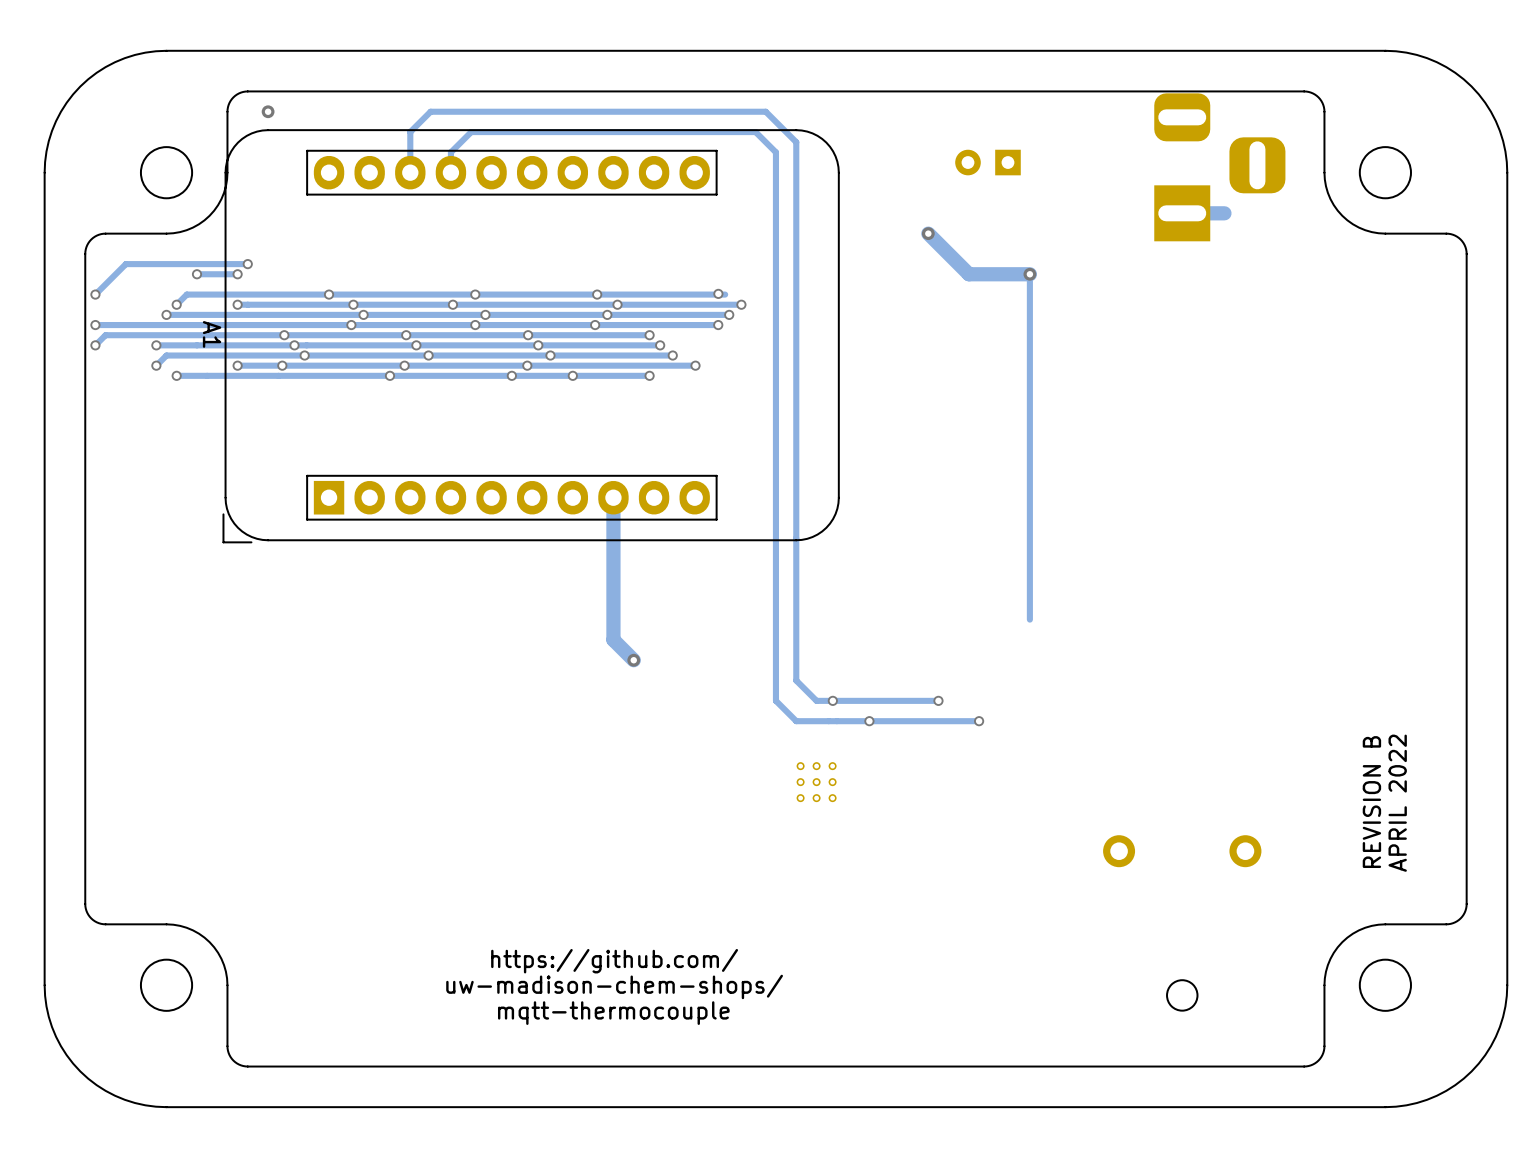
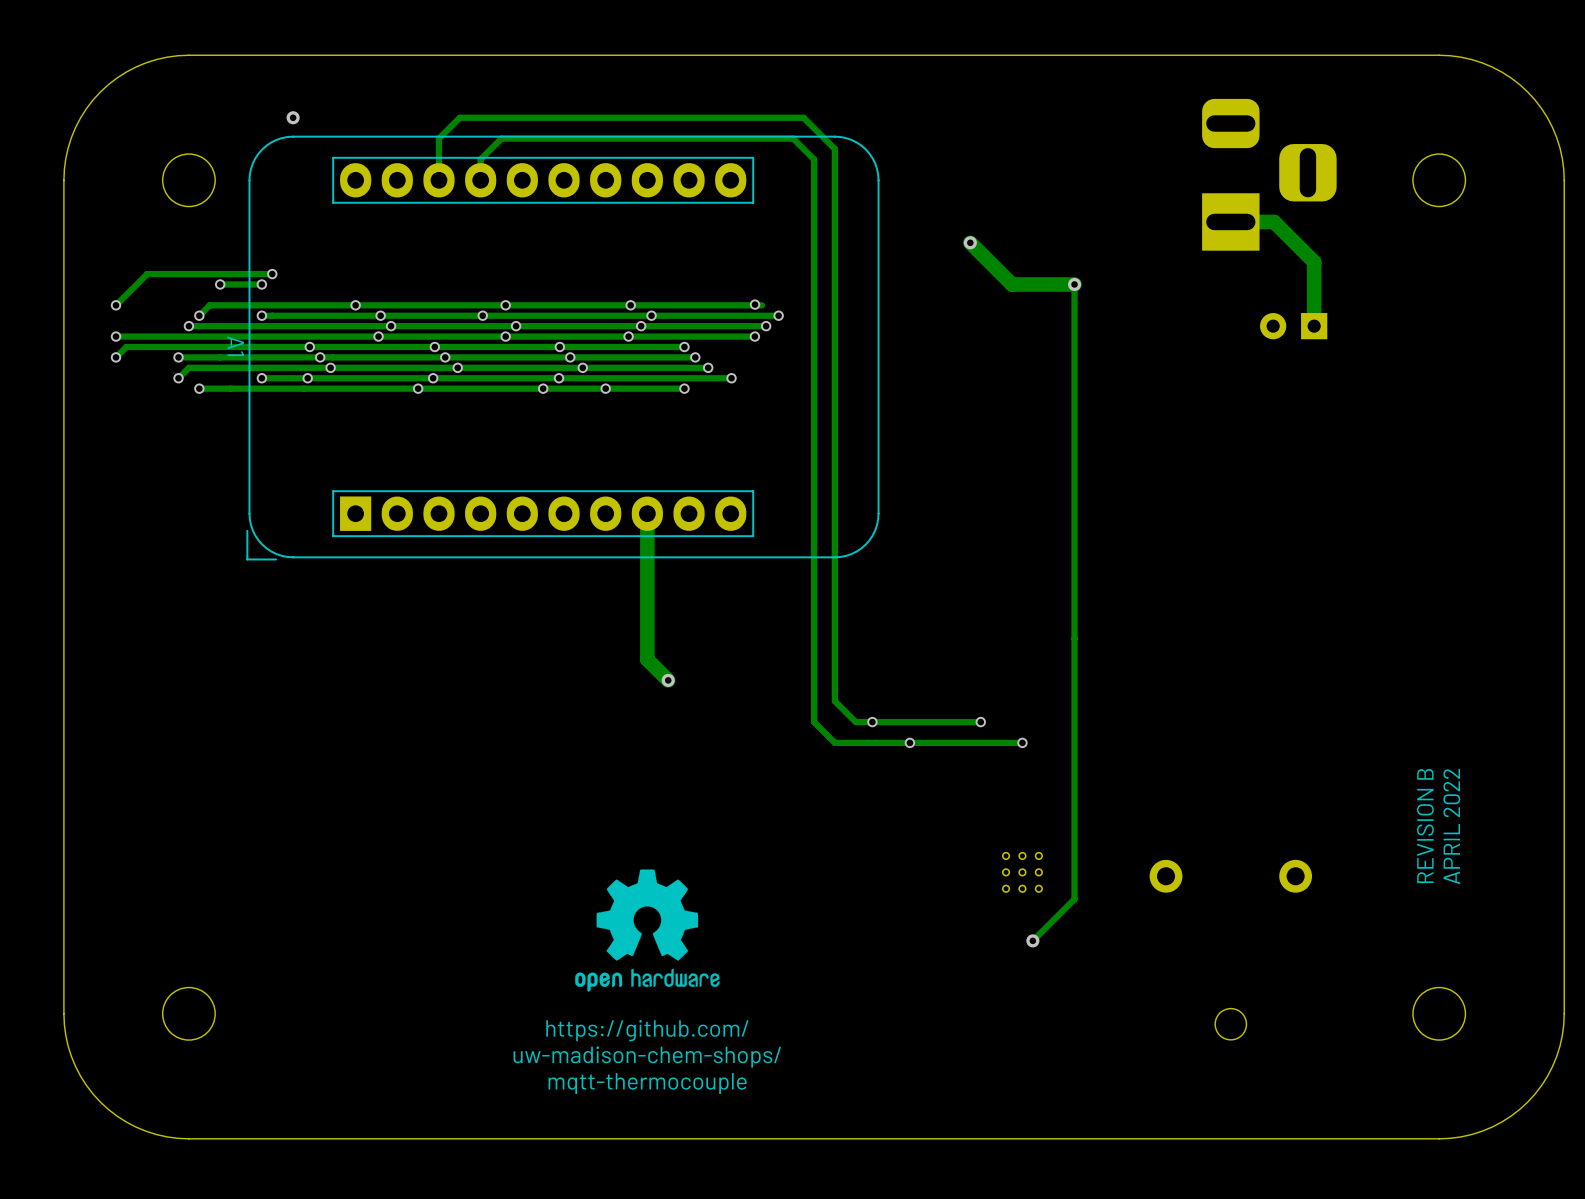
line: (1304, 91) (247, 91) (236, 94) (230, 100) (227, 109) (225, 186) (218, 205) (209, 215) (192, 227) (173, 233) (101, 234) (91, 239) (85, 249) (85, 904) (88, 914) (94, 921) (103, 924) (180, 925) (198, 933) (209, 942) (218, 952) (225, 971) (228, 1052) (235, 1062) (245, 1066) (1304, 1066) (1314, 1063) (1321, 1057) (1324, 1048) (1325, 971) (1333, 952) (1342, 942) (1358, 930) (1378, 924) (1450, 923) (1460, 918) (1466, 908) (1466, 253) (1463, 243) (1453, 234) (1371, 232) (1352, 224) (1342, 215) (1330, 199) (1325, 186) (1323, 105) (1314, 94) (1304, 91) -> none
part position: (987, 162) -> (1293, 326)
track: none -> (1274, 221) (1314, 262) (1314, 326)
track: none -> (1074, 638) (1074, 899) (1032, 940)
part position: (816, 782) -> (1022, 872)
drawing: none -> [575, 869, 720, 992]
via: none -> (1032, 940)
text position: https://github.com/ (614, 961) -> https://github.com/ (647, 1030)
text position: uw-madison-chem-shops/ (614, 986) -> uw-madison-chem-shops/ (647, 1057)
text position: mqtt-thermocouple (613, 1013) -> mqtt-thermocouple (647, 1083)

